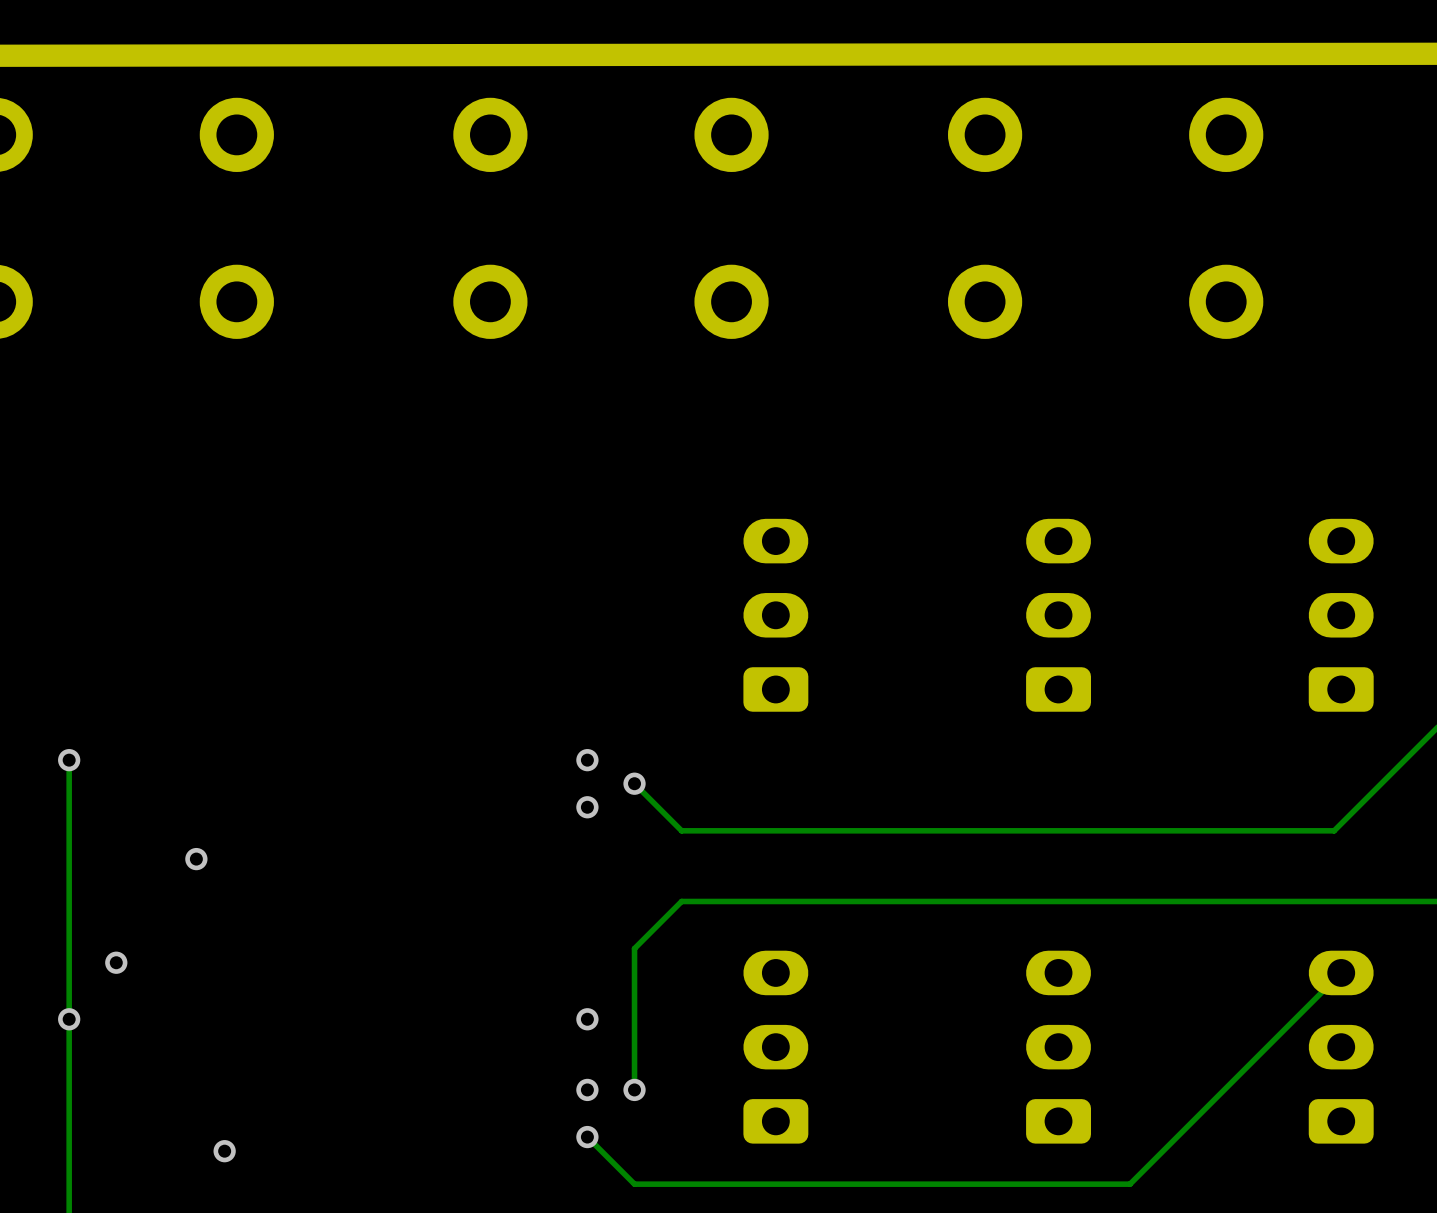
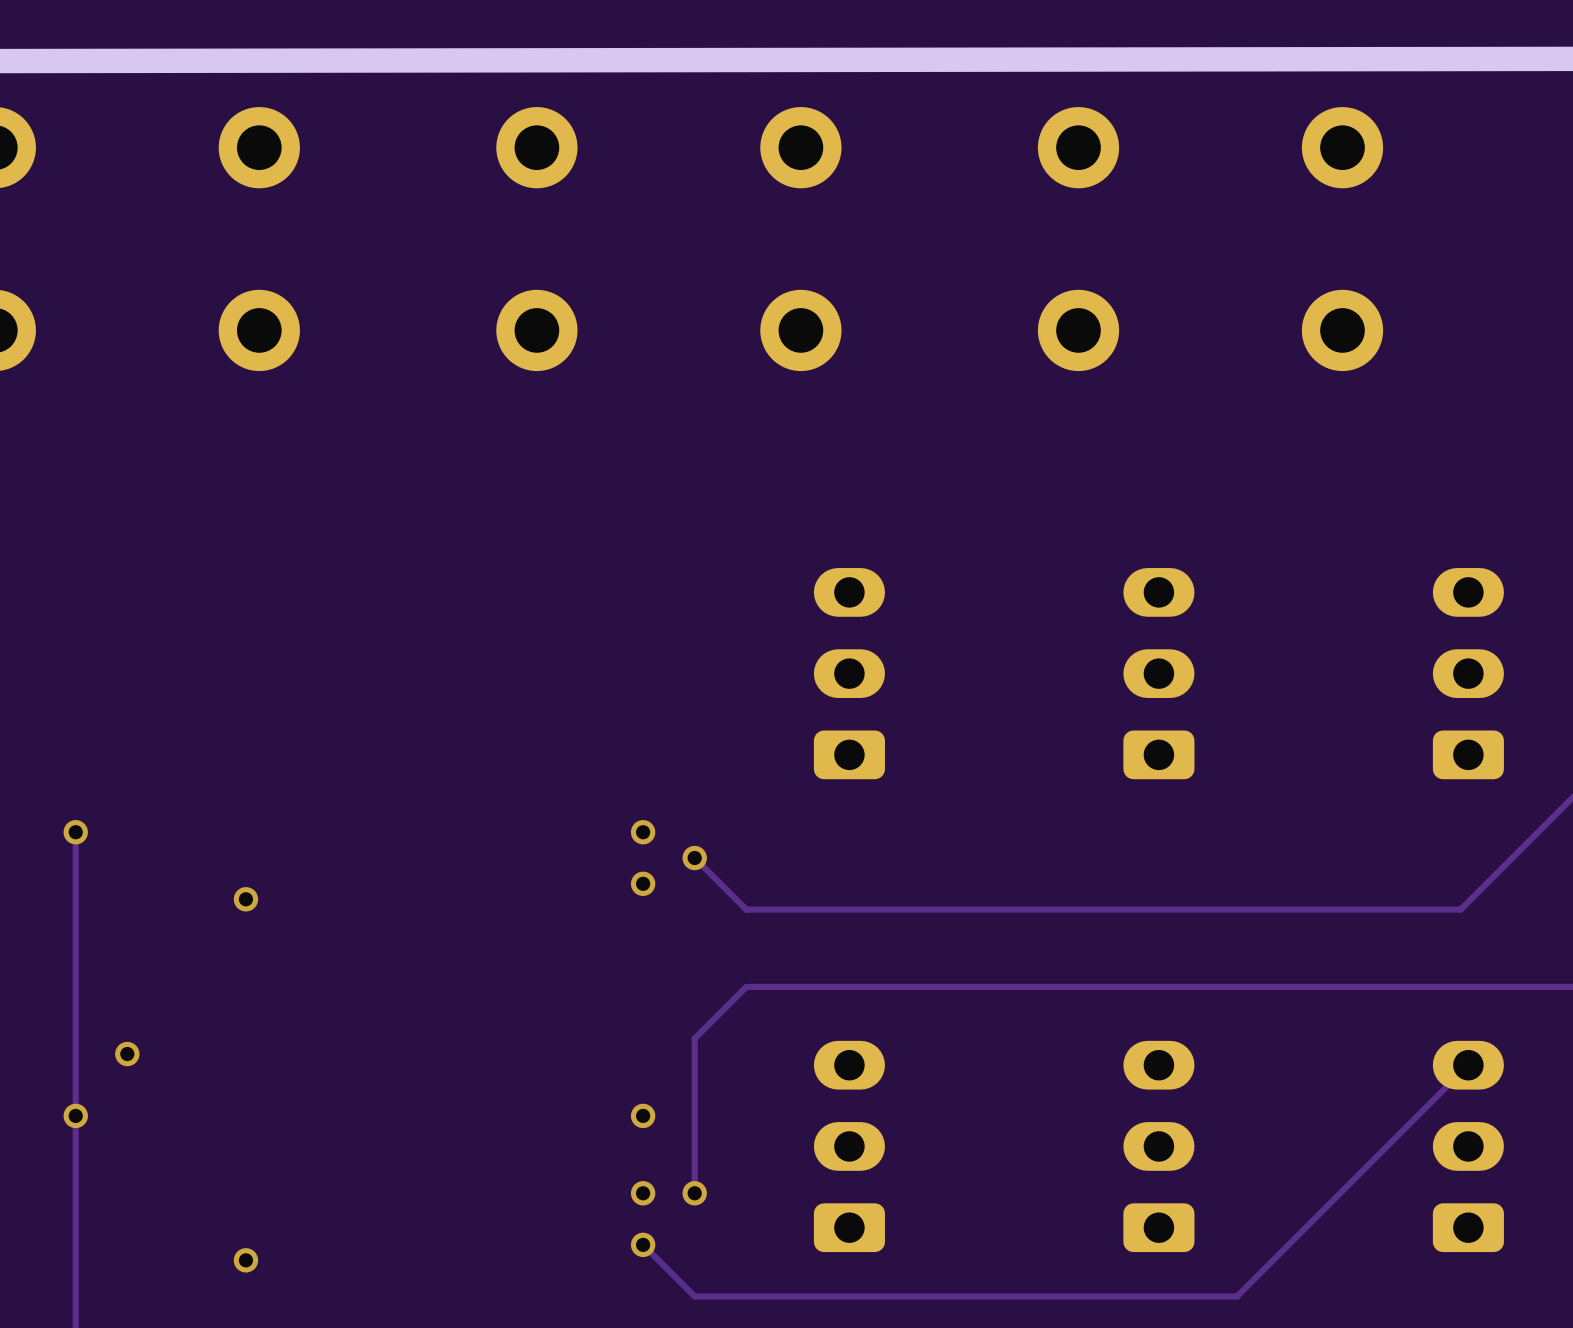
via position: (196, 859) -> (245, 899)

